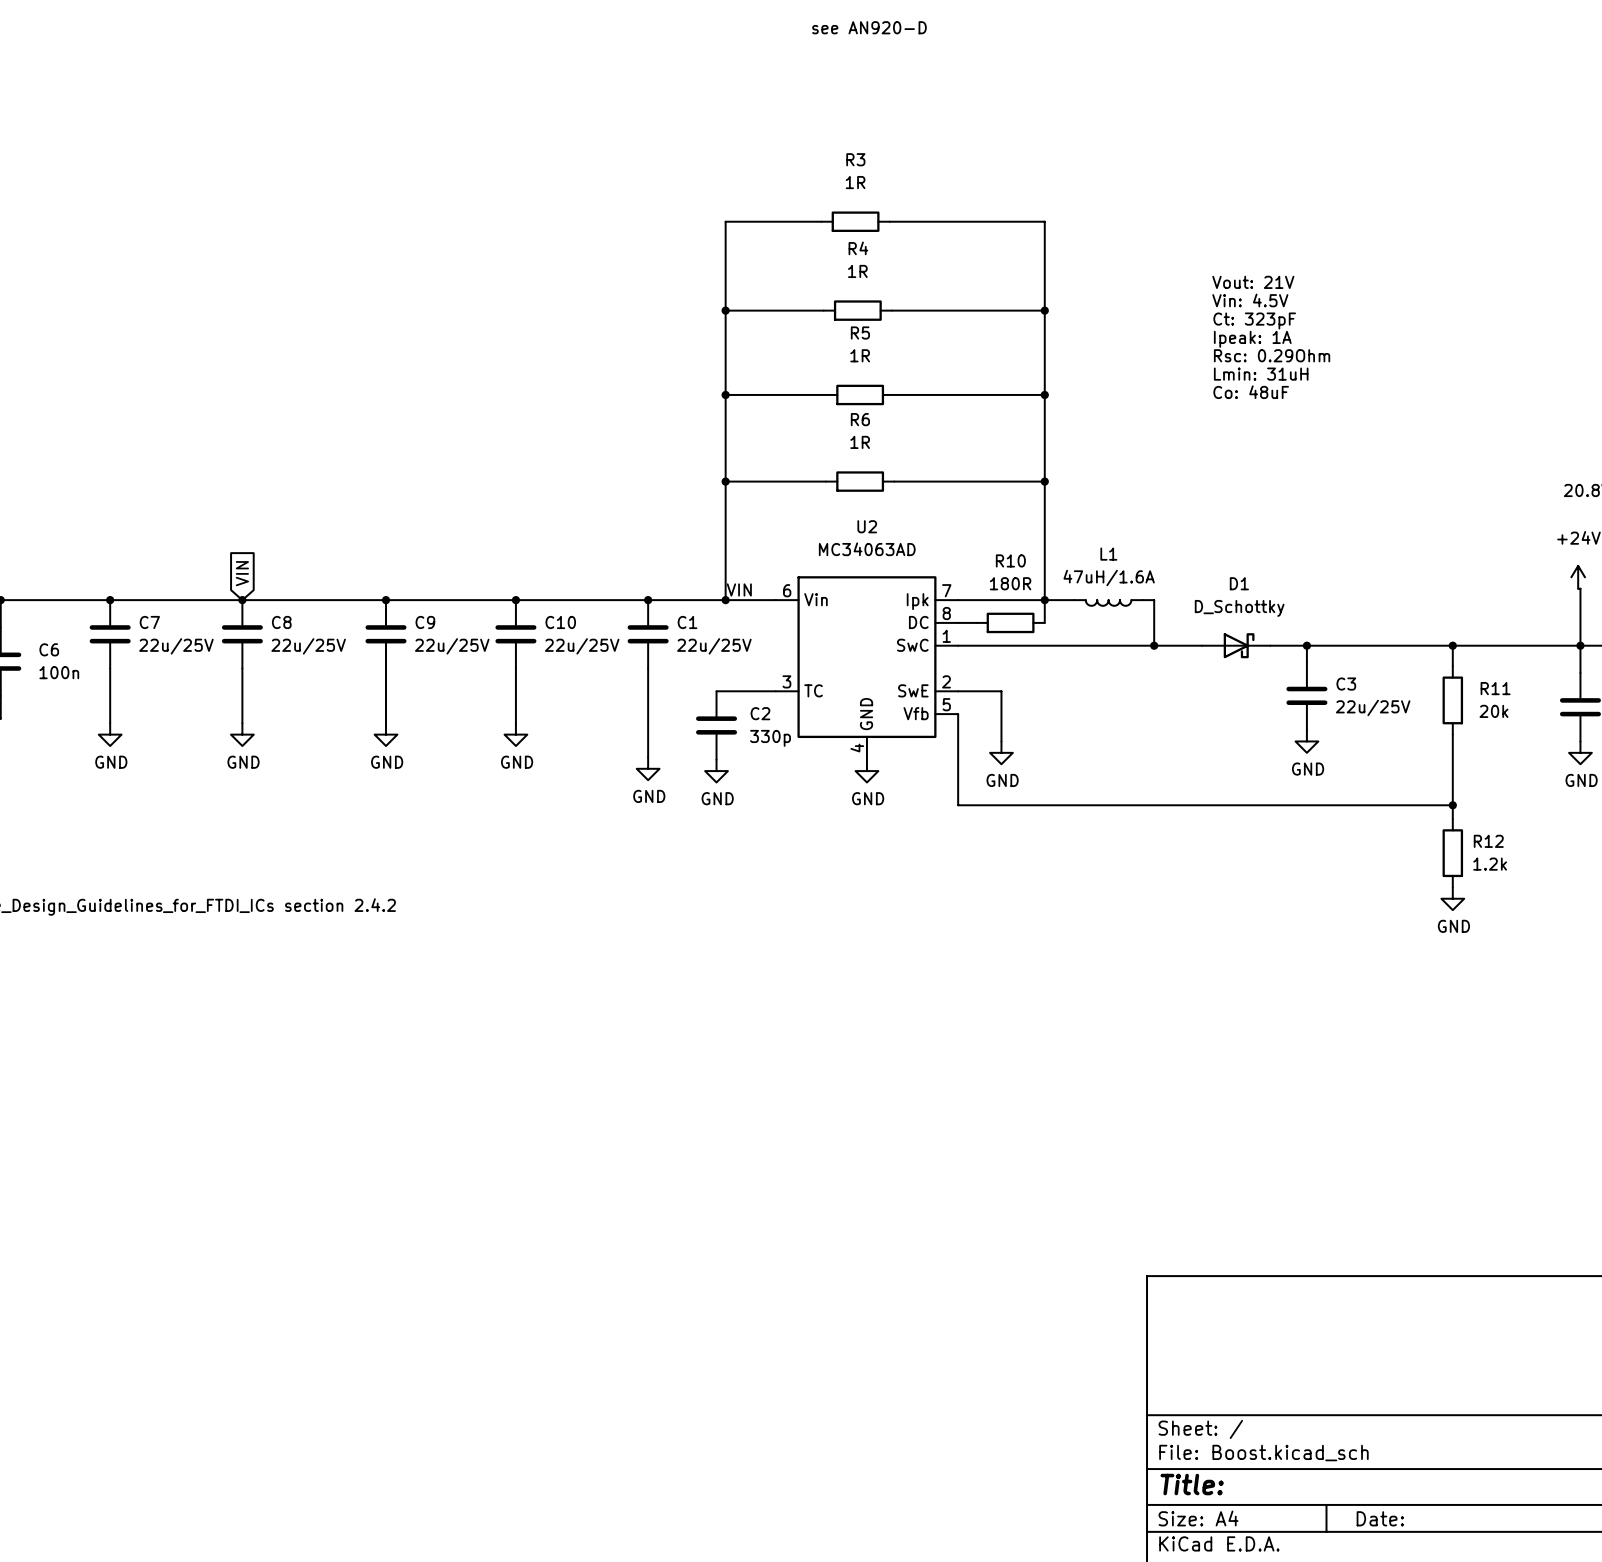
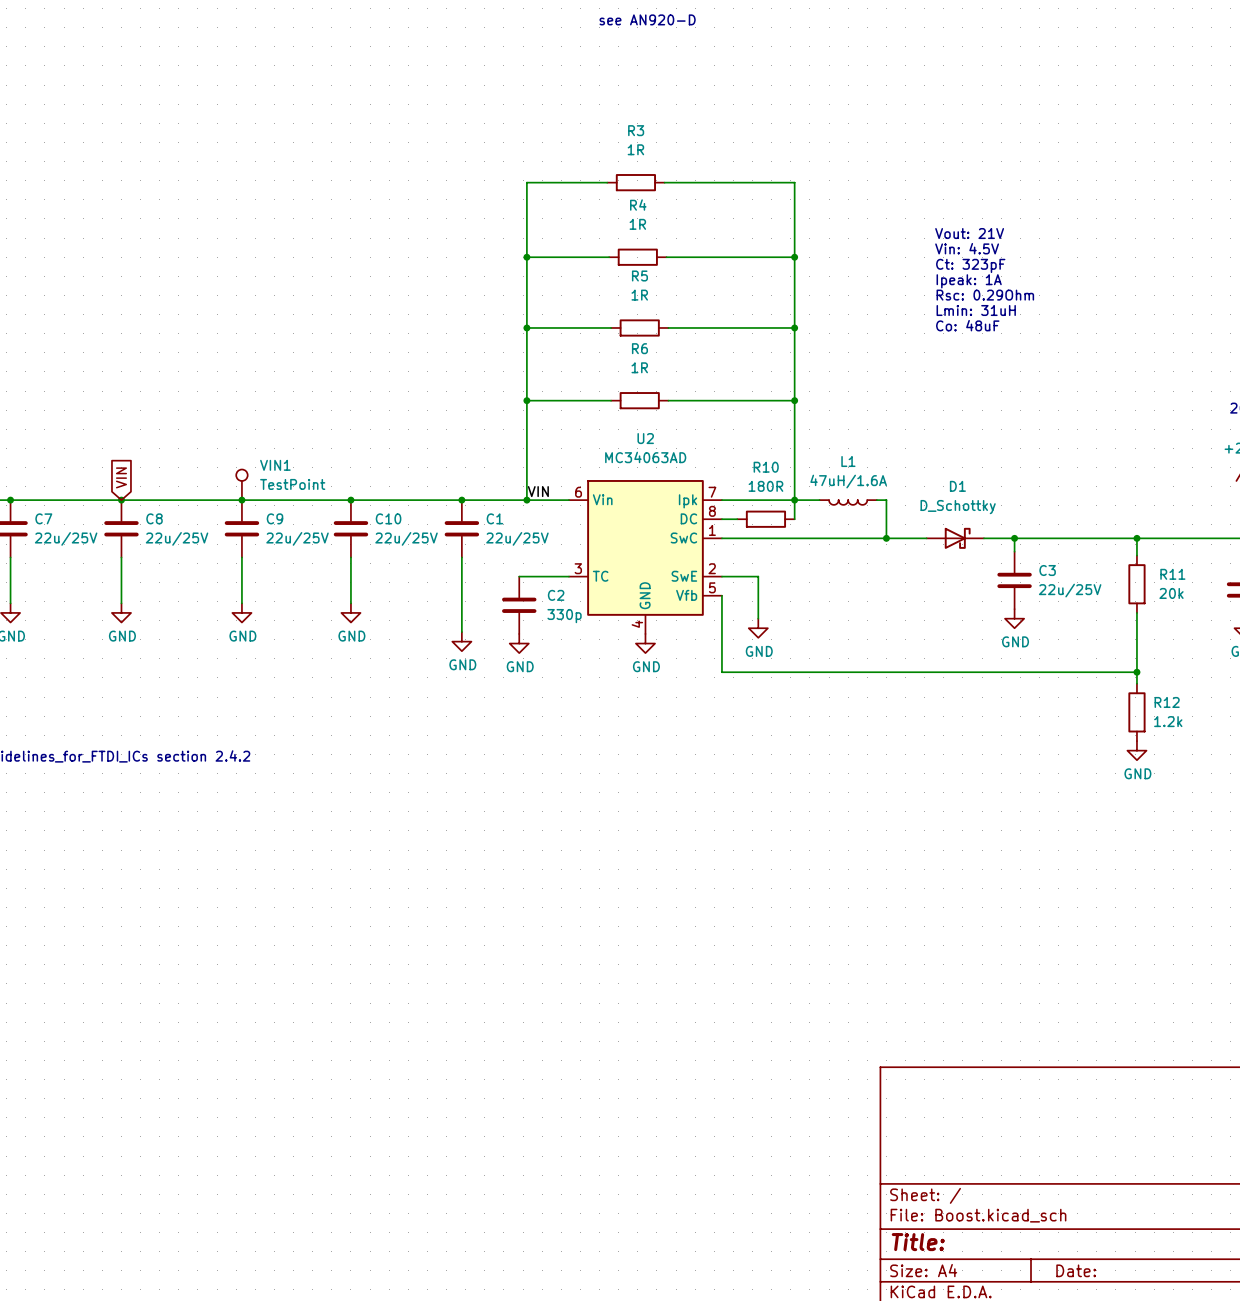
VIN1: none -> TestPoint (241, 484)

